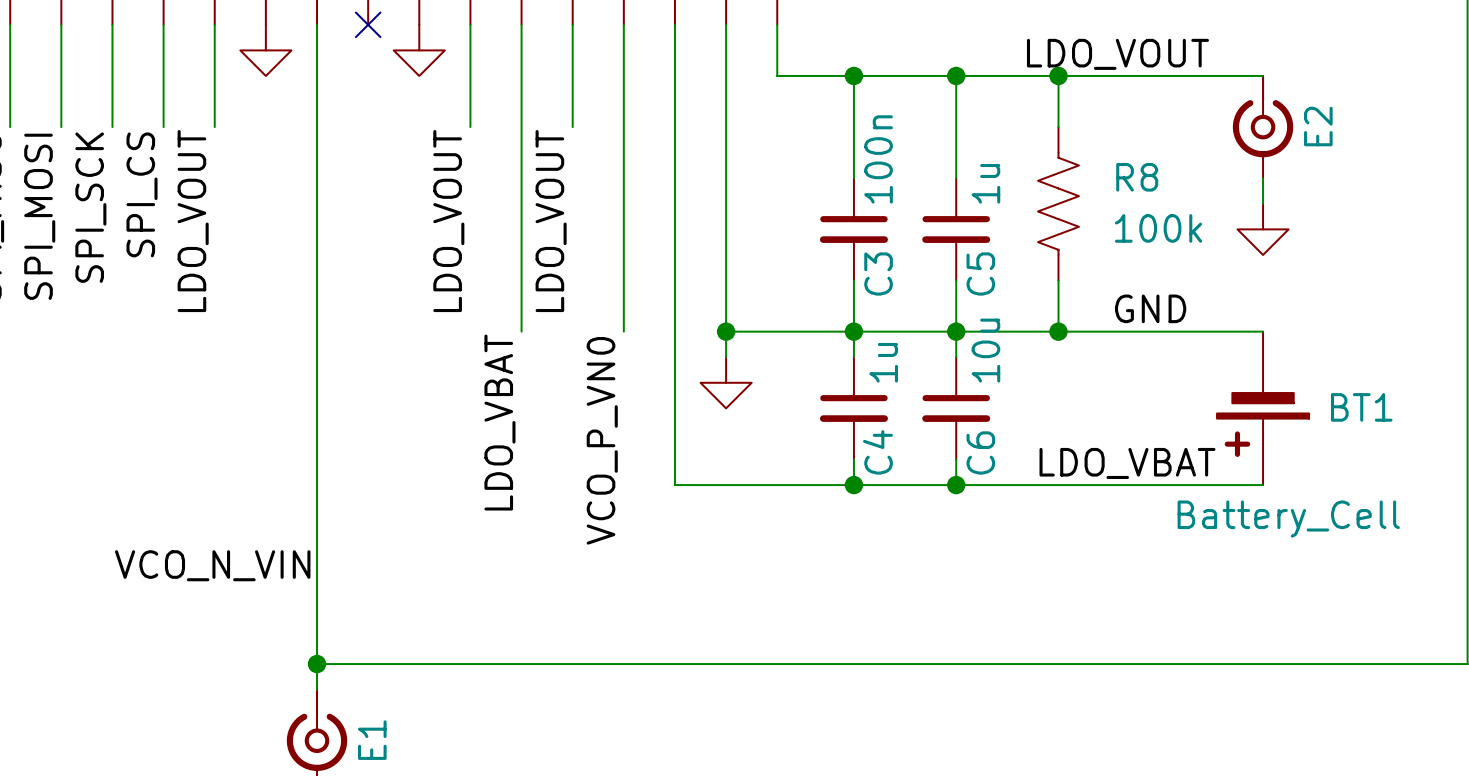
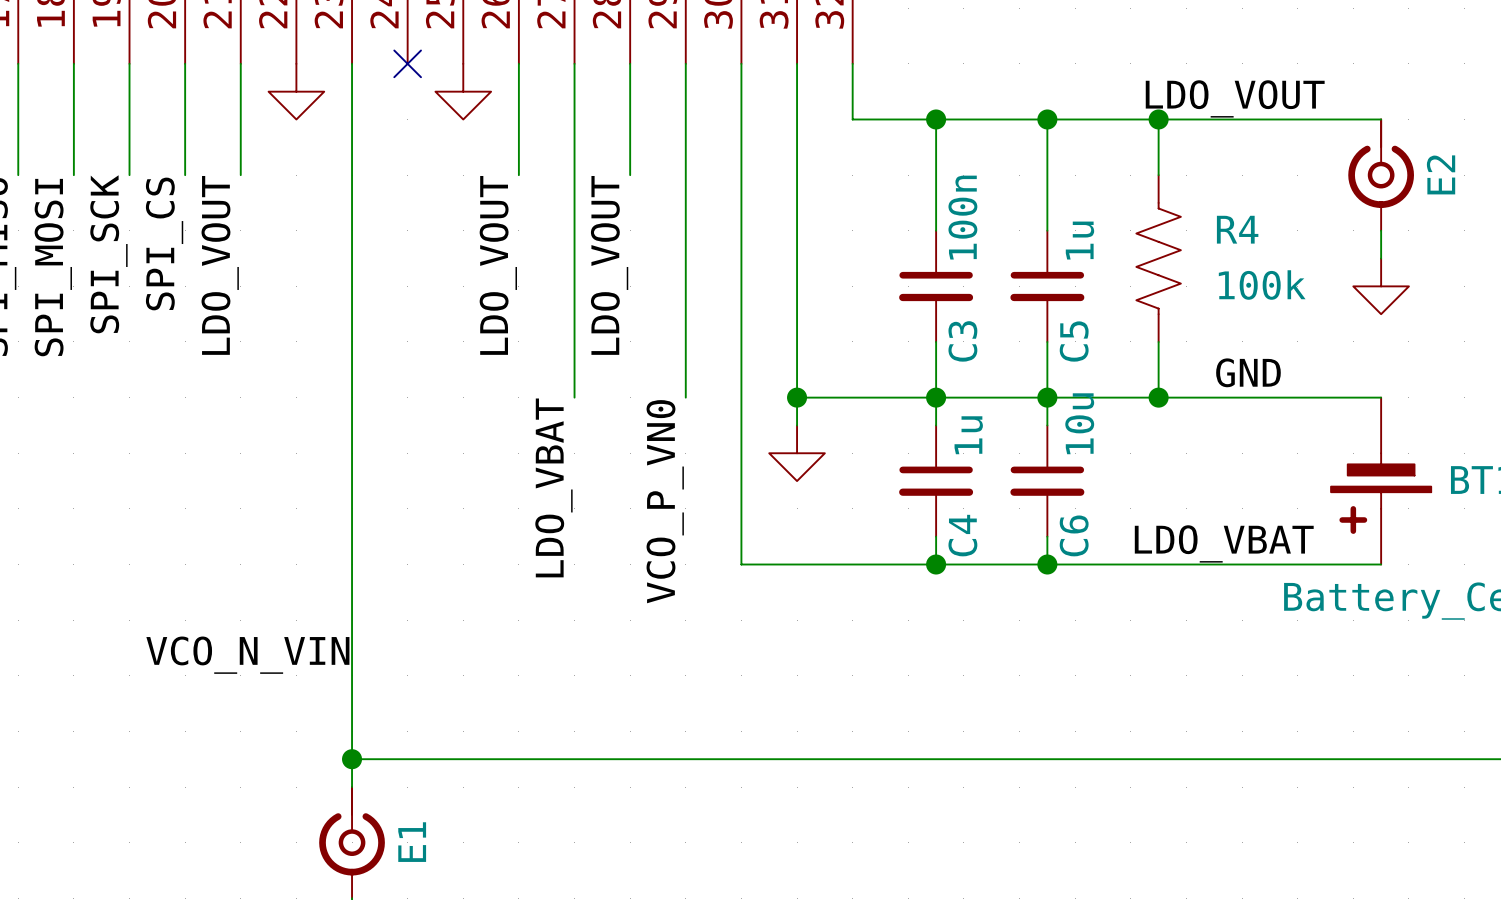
R8 name: R8 (1137, 177) -> R4 (1237, 229)

